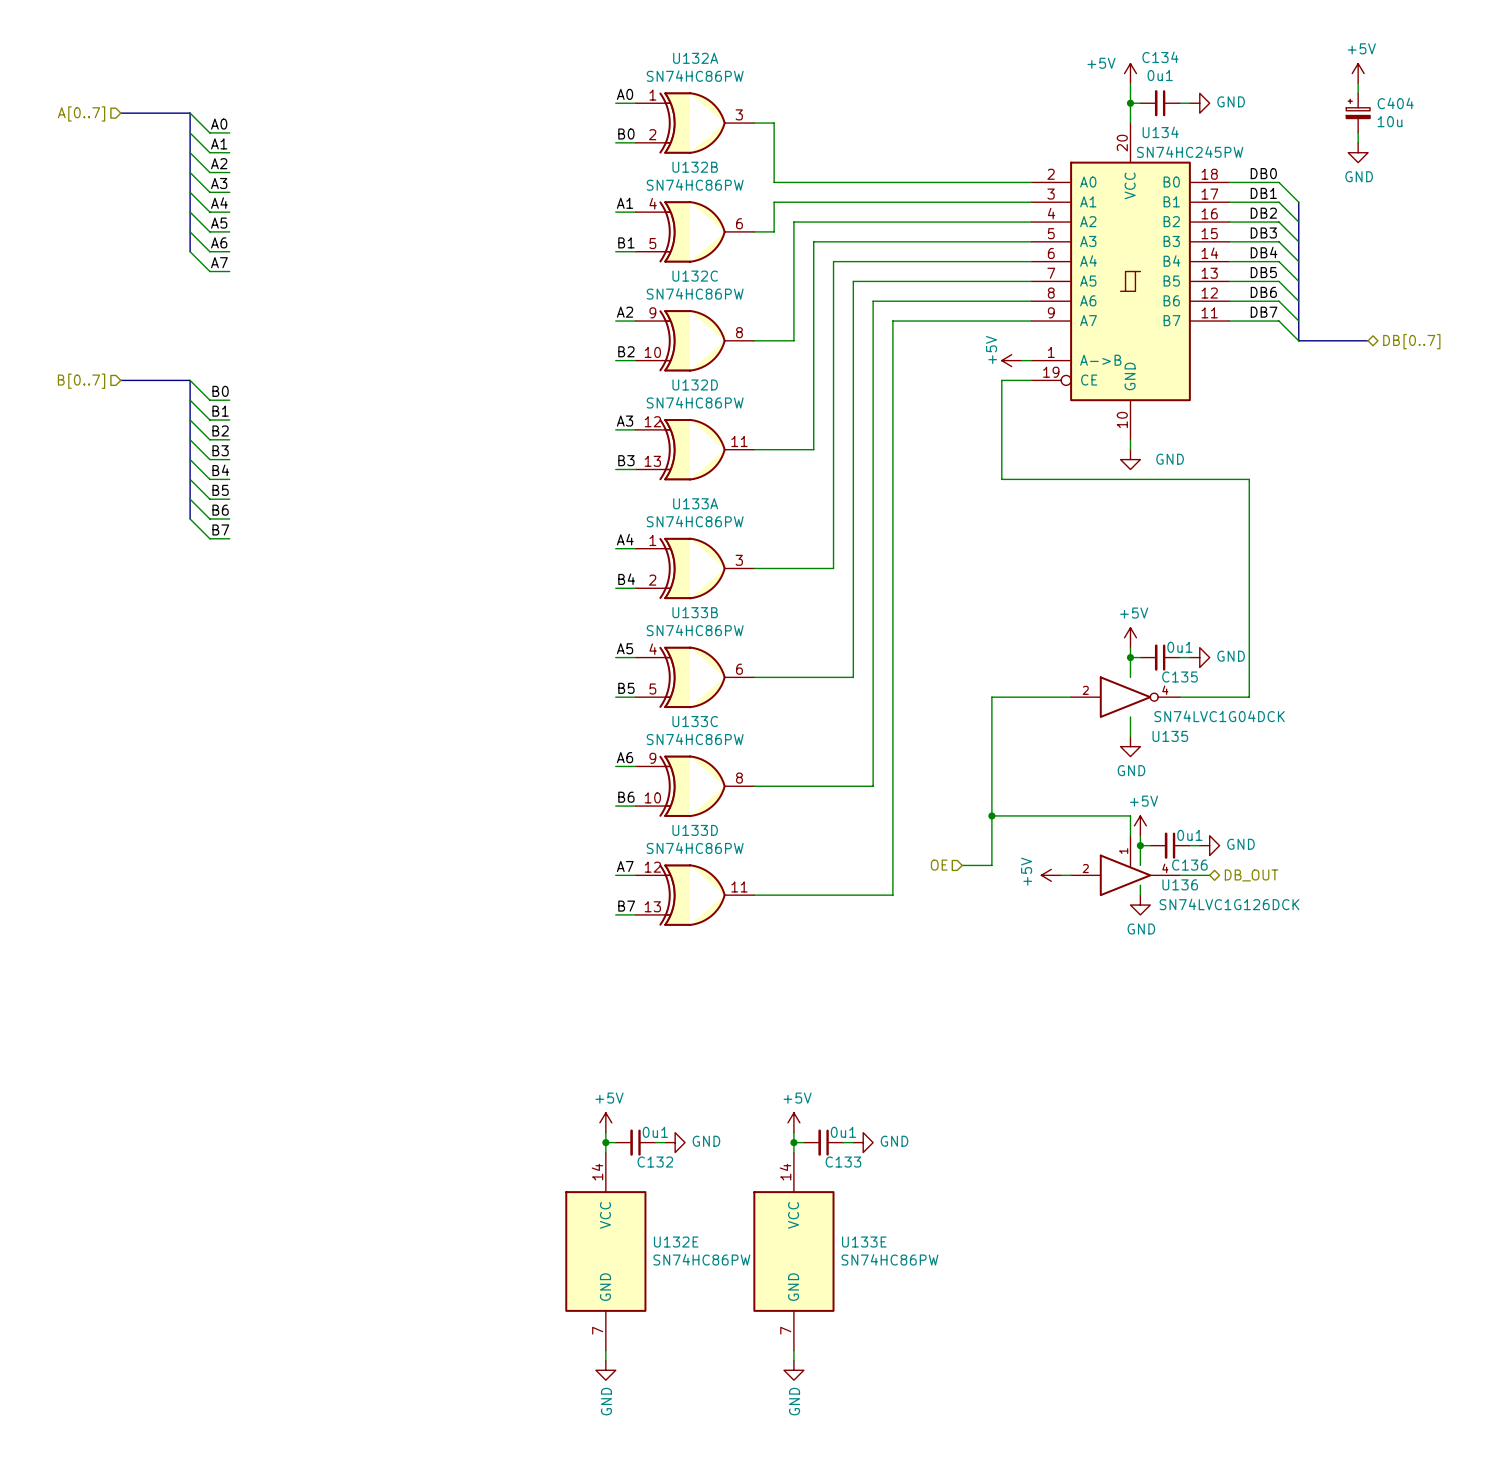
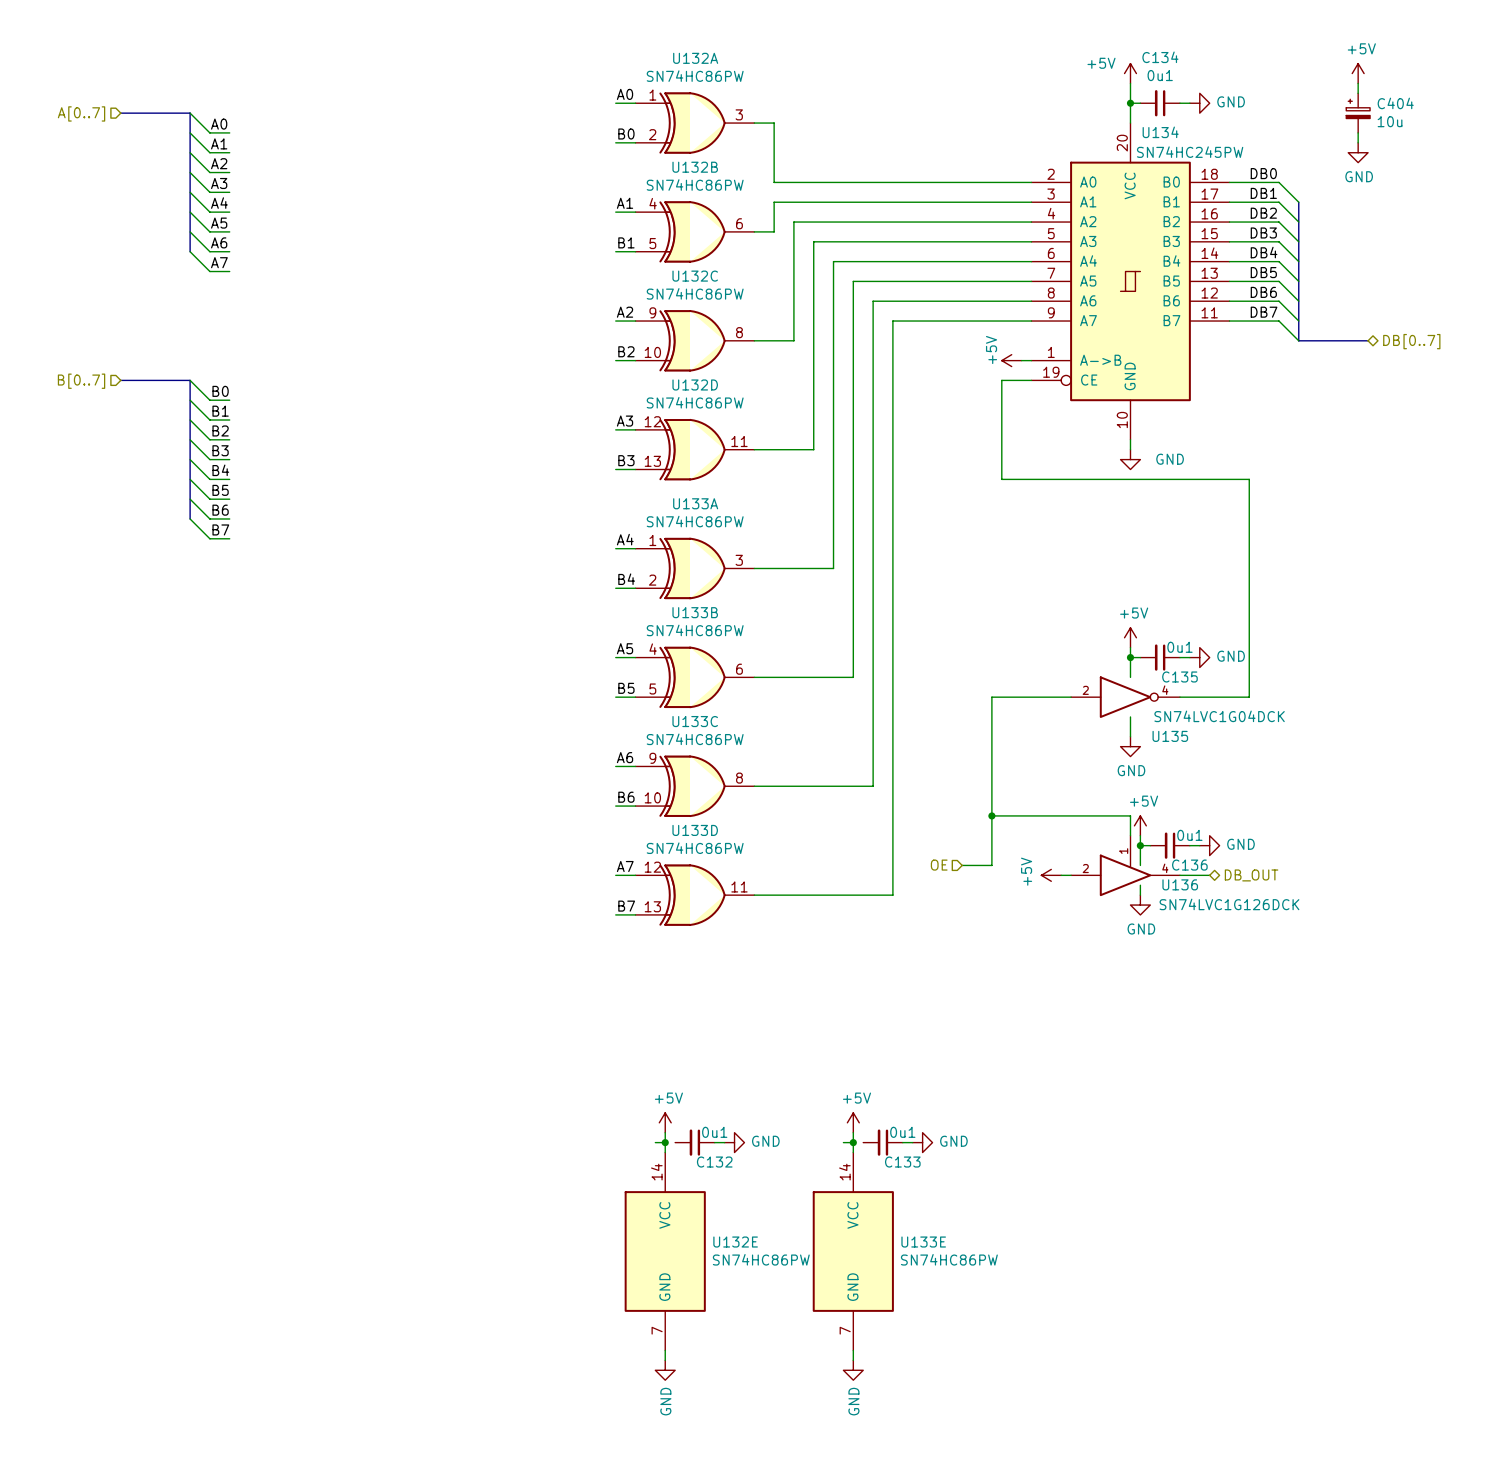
power symbol position: +5V (605, 1122) -> +5V (665, 1122)
power symbol position: +5V (793, 1122) -> +5V (853, 1122)
wire: (605, 1132) (605, 1152) -> (665, 1132) (665, 1152)
wire: (793, 1132) (793, 1152) -> (853, 1132) (853, 1152)
wire: (605, 1142) (615, 1142) -> (714, 1142) (724, 1142)
junction: (605, 1142) -> none
C132 position: (635, 1142) -> (694, 1142)
junction: none -> (665, 1142)
power symbol position: GND (675, 1142) -> GND (734, 1142)
wire: (793, 1142) (803, 1142) -> (902, 1142) (912, 1142)
junction: (793, 1142) -> none
C133 position: (823, 1142) -> (883, 1142)
junction: none -> (853, 1142)
power symbol position: GND (863, 1142) -> GND (922, 1142)
U132E position: (605, 1251) -> (665, 1251)
U133E position: (793, 1251) -> (853, 1251)
wire: (605, 1350) (605, 1360) -> (665, 1350) (665, 1360)
wire: (793, 1350) (793, 1360) -> (853, 1350) (853, 1360)
power symbol position: GND (605, 1370) -> GND (665, 1370)
power symbol position: GND (793, 1370) -> GND (853, 1370)

